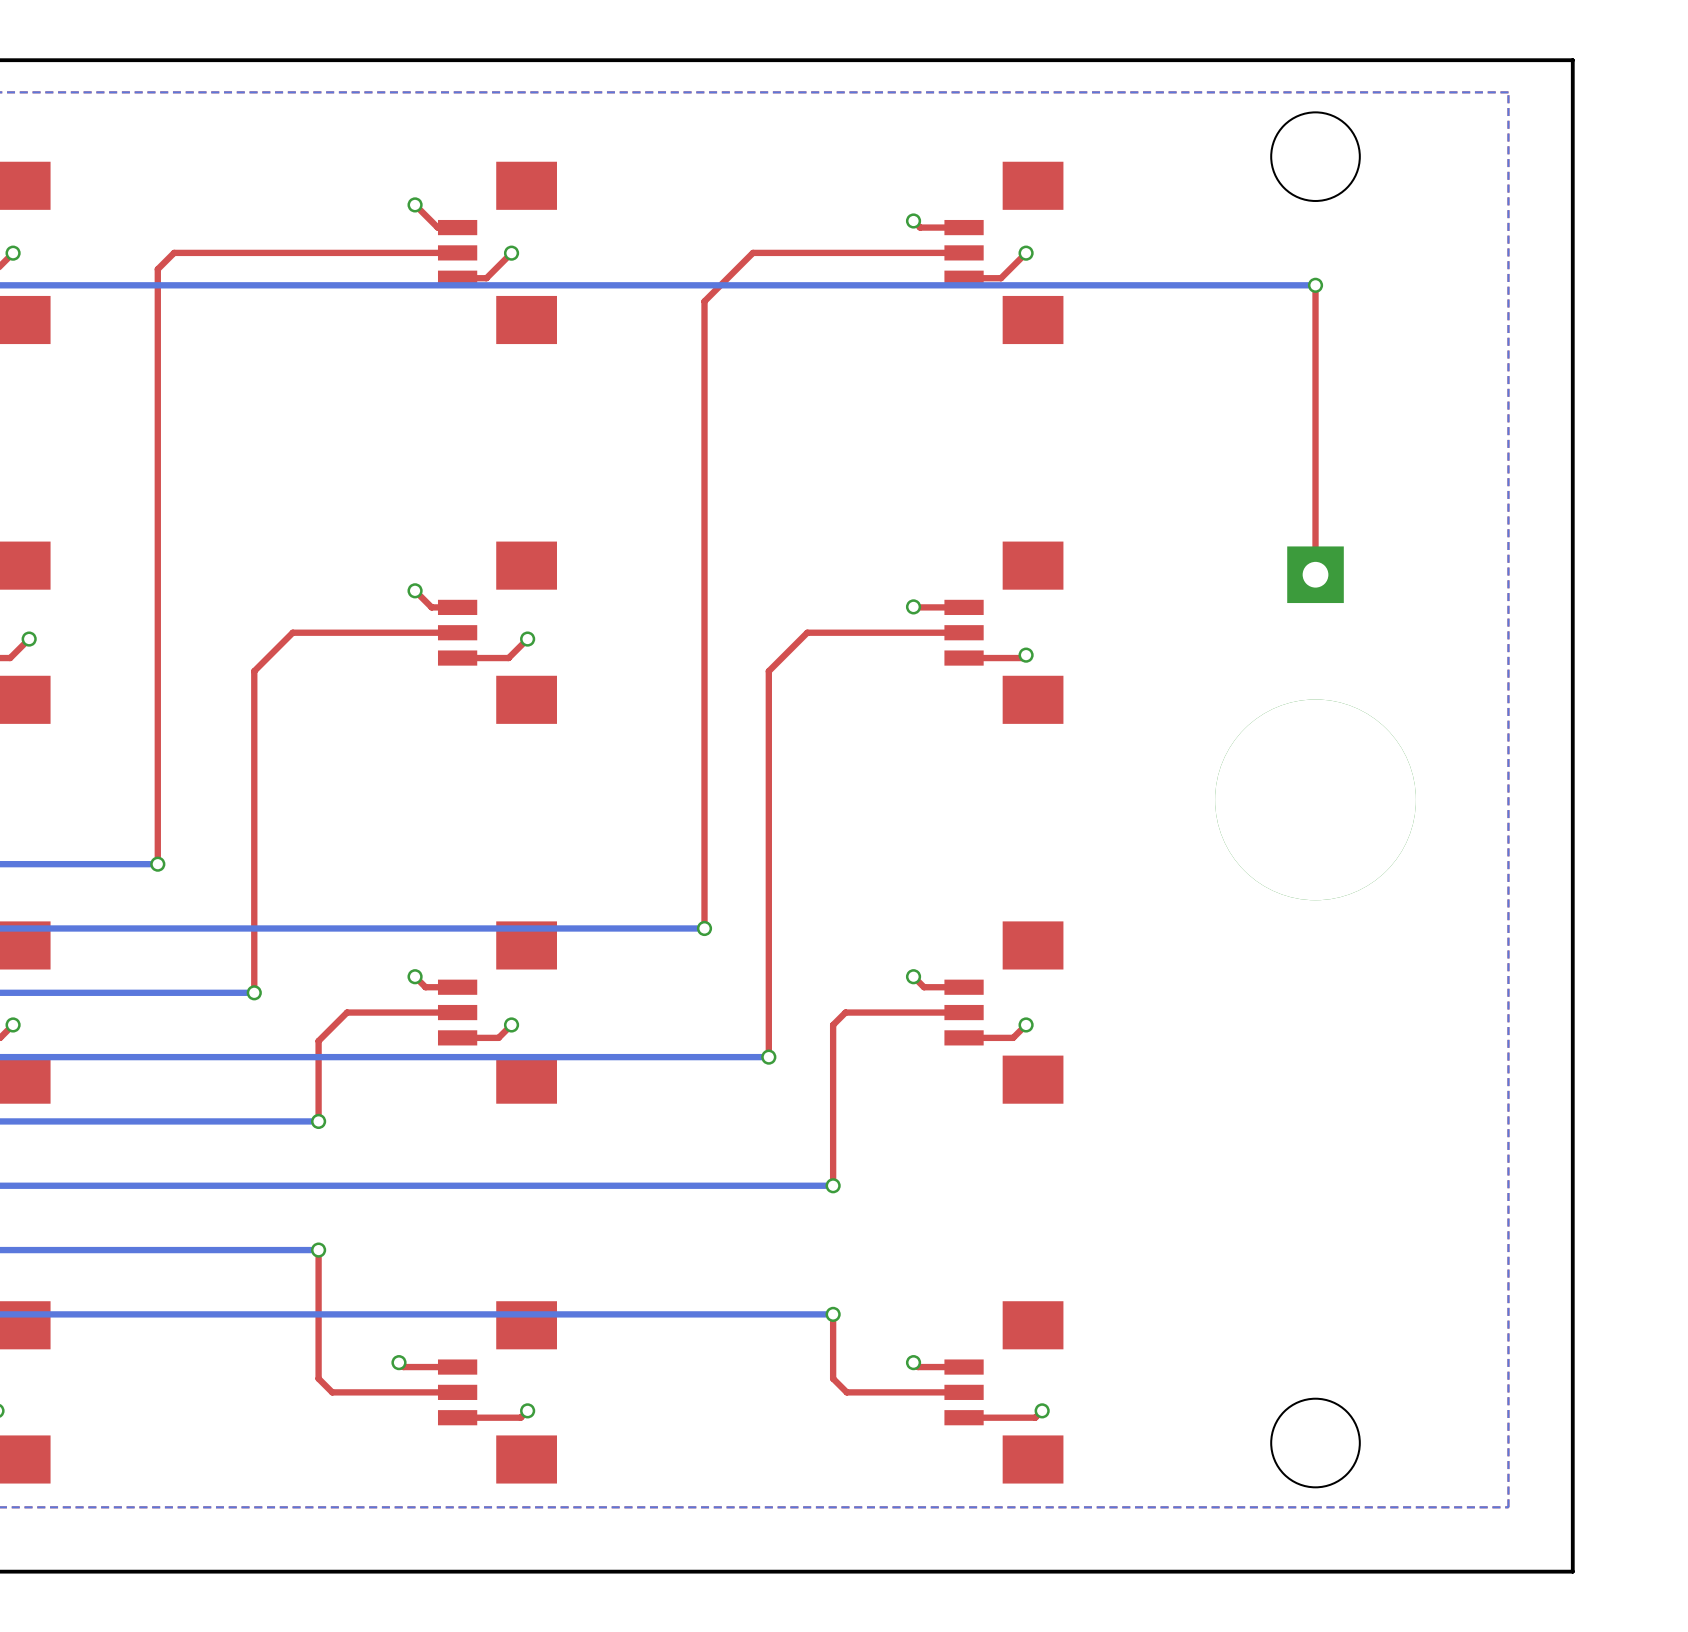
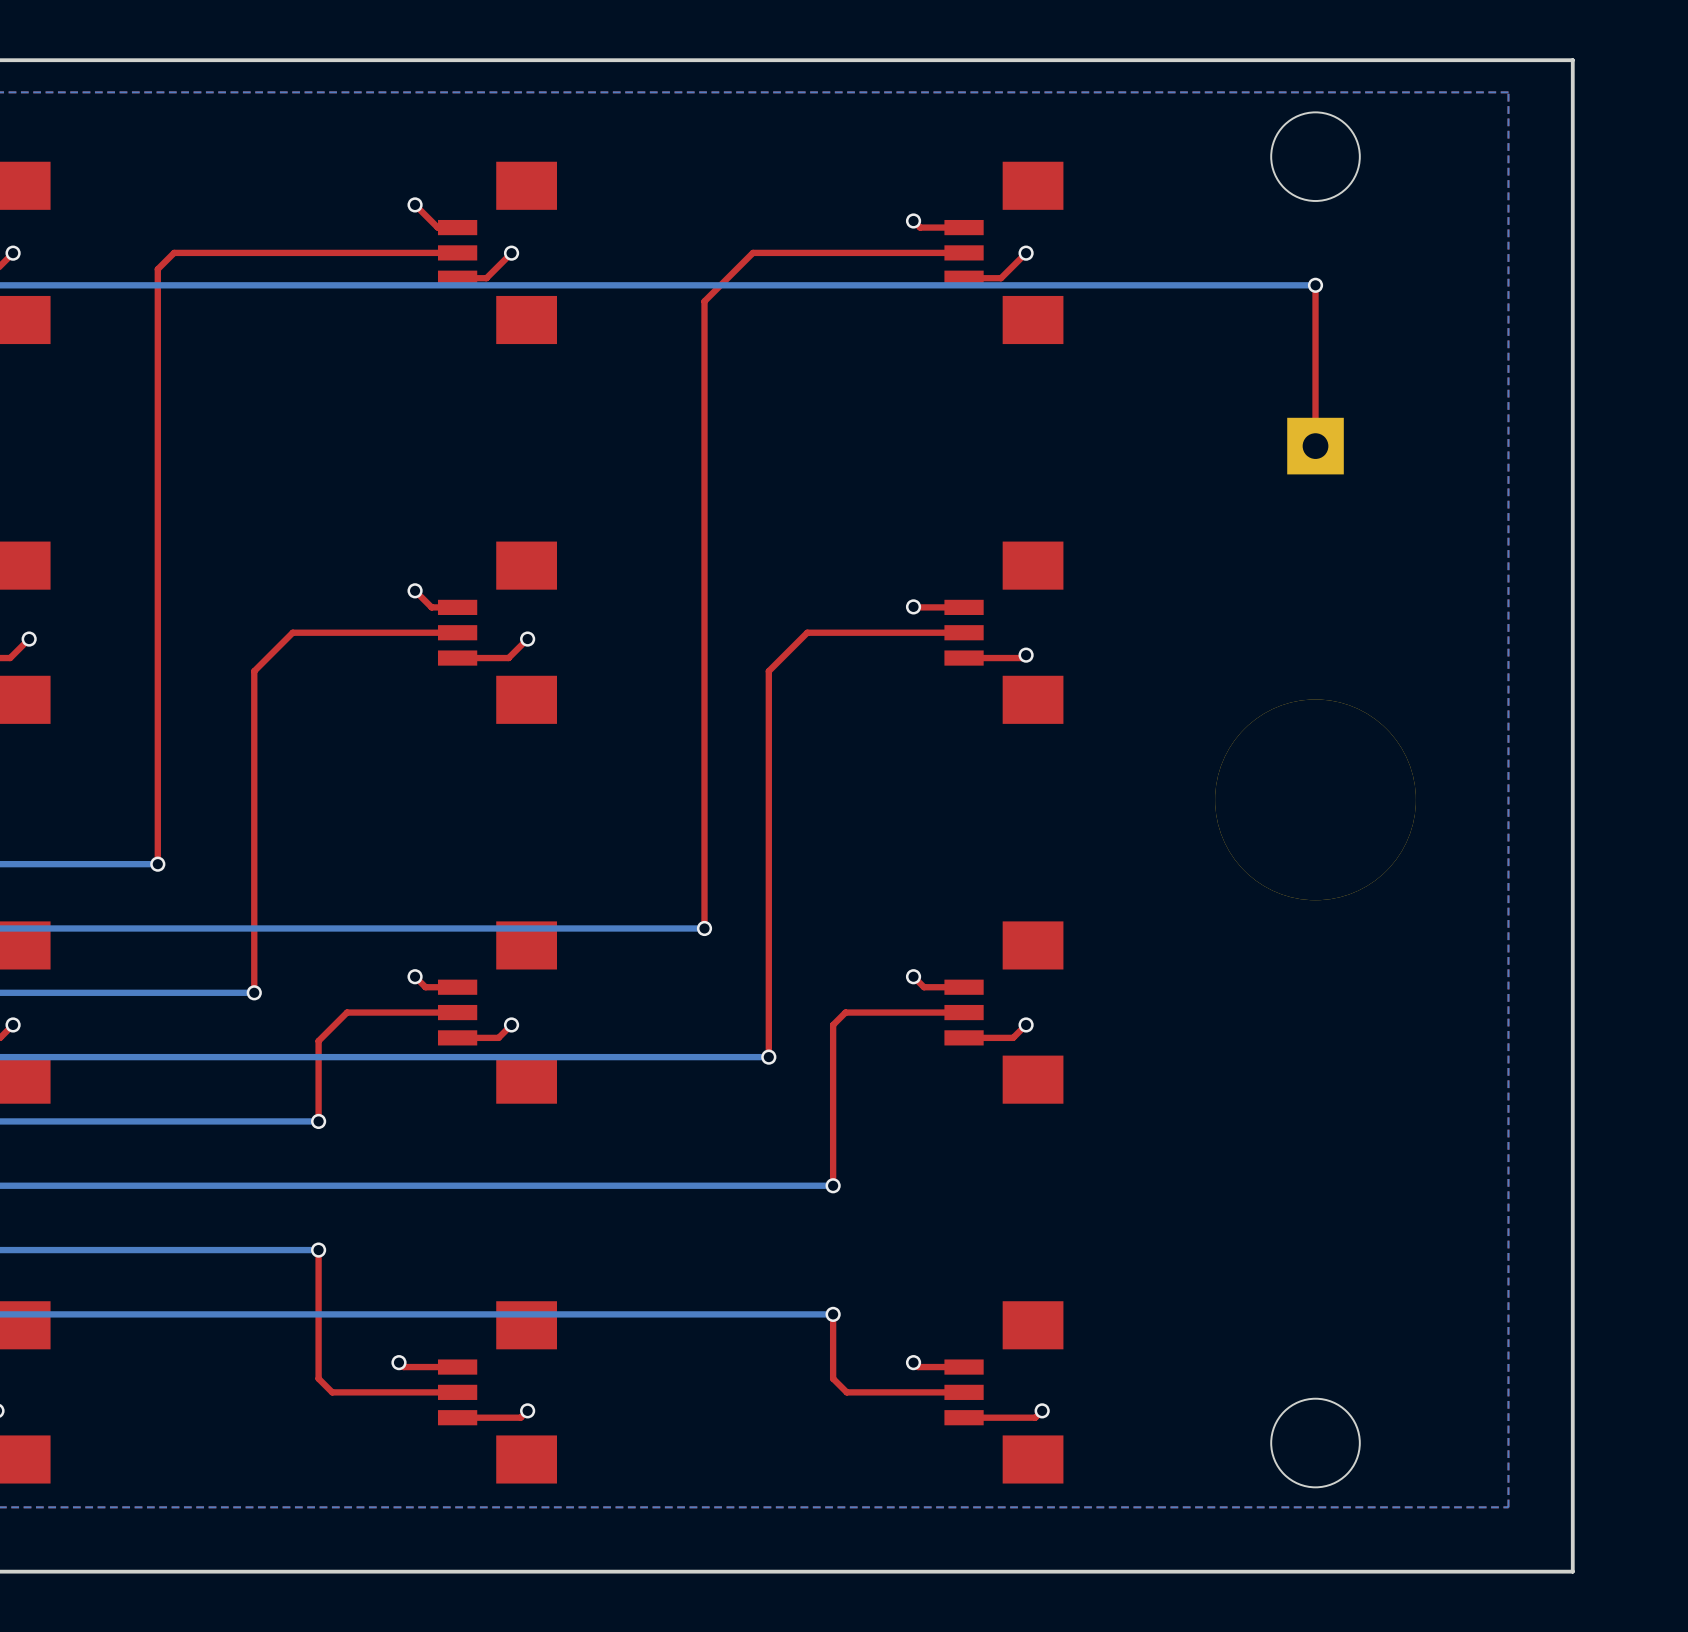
top track: (1315, 446) (1315, 574) -> none
part position: (1315, 574) -> (1315, 446)

